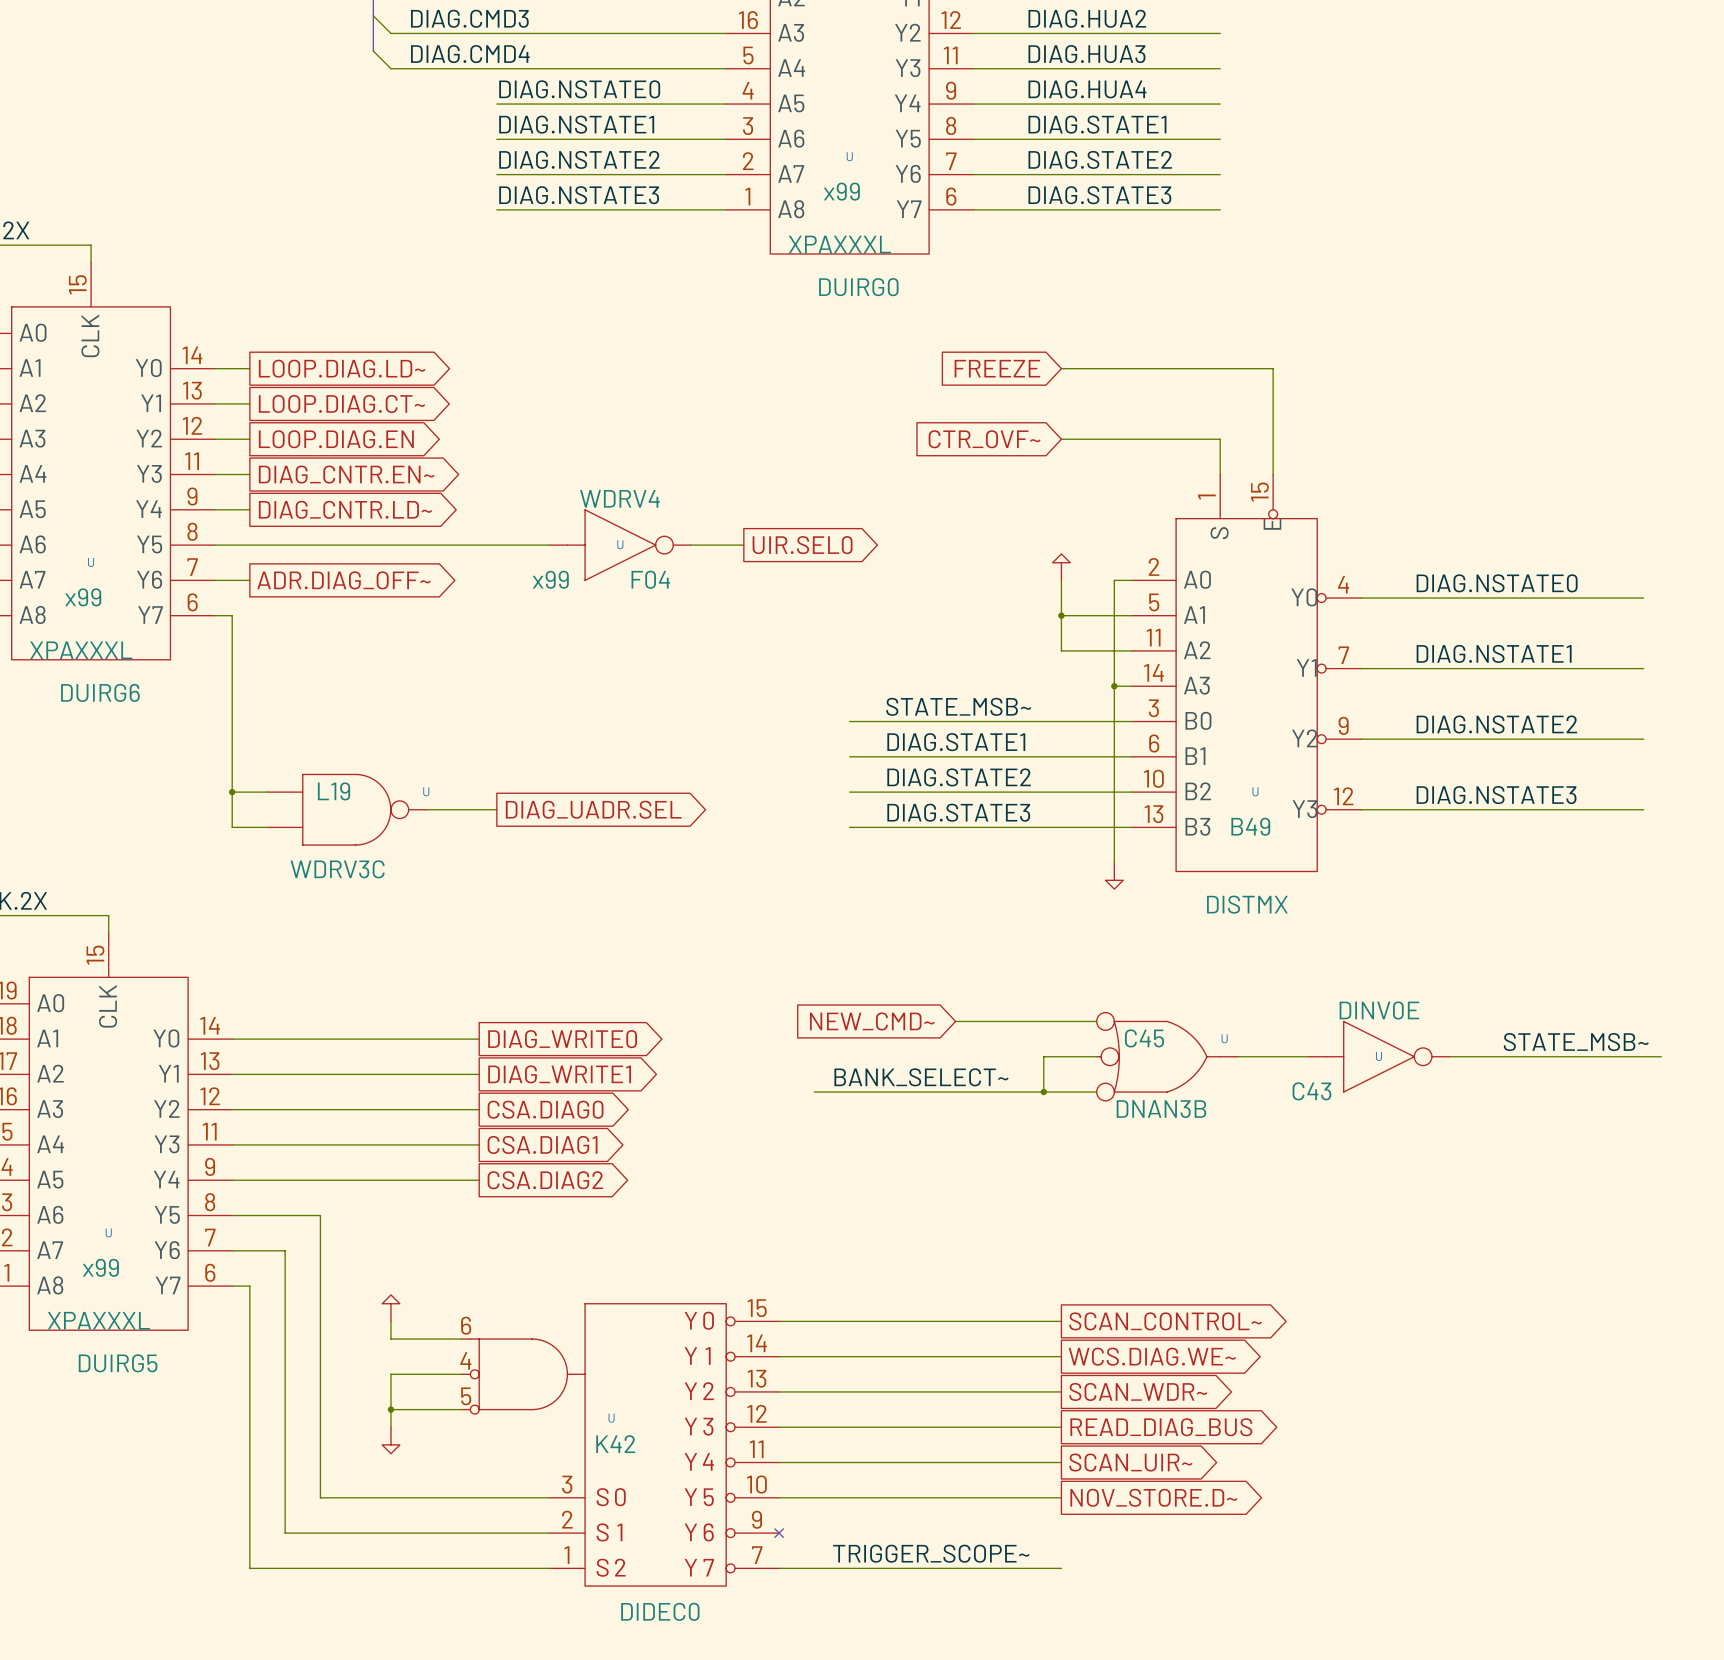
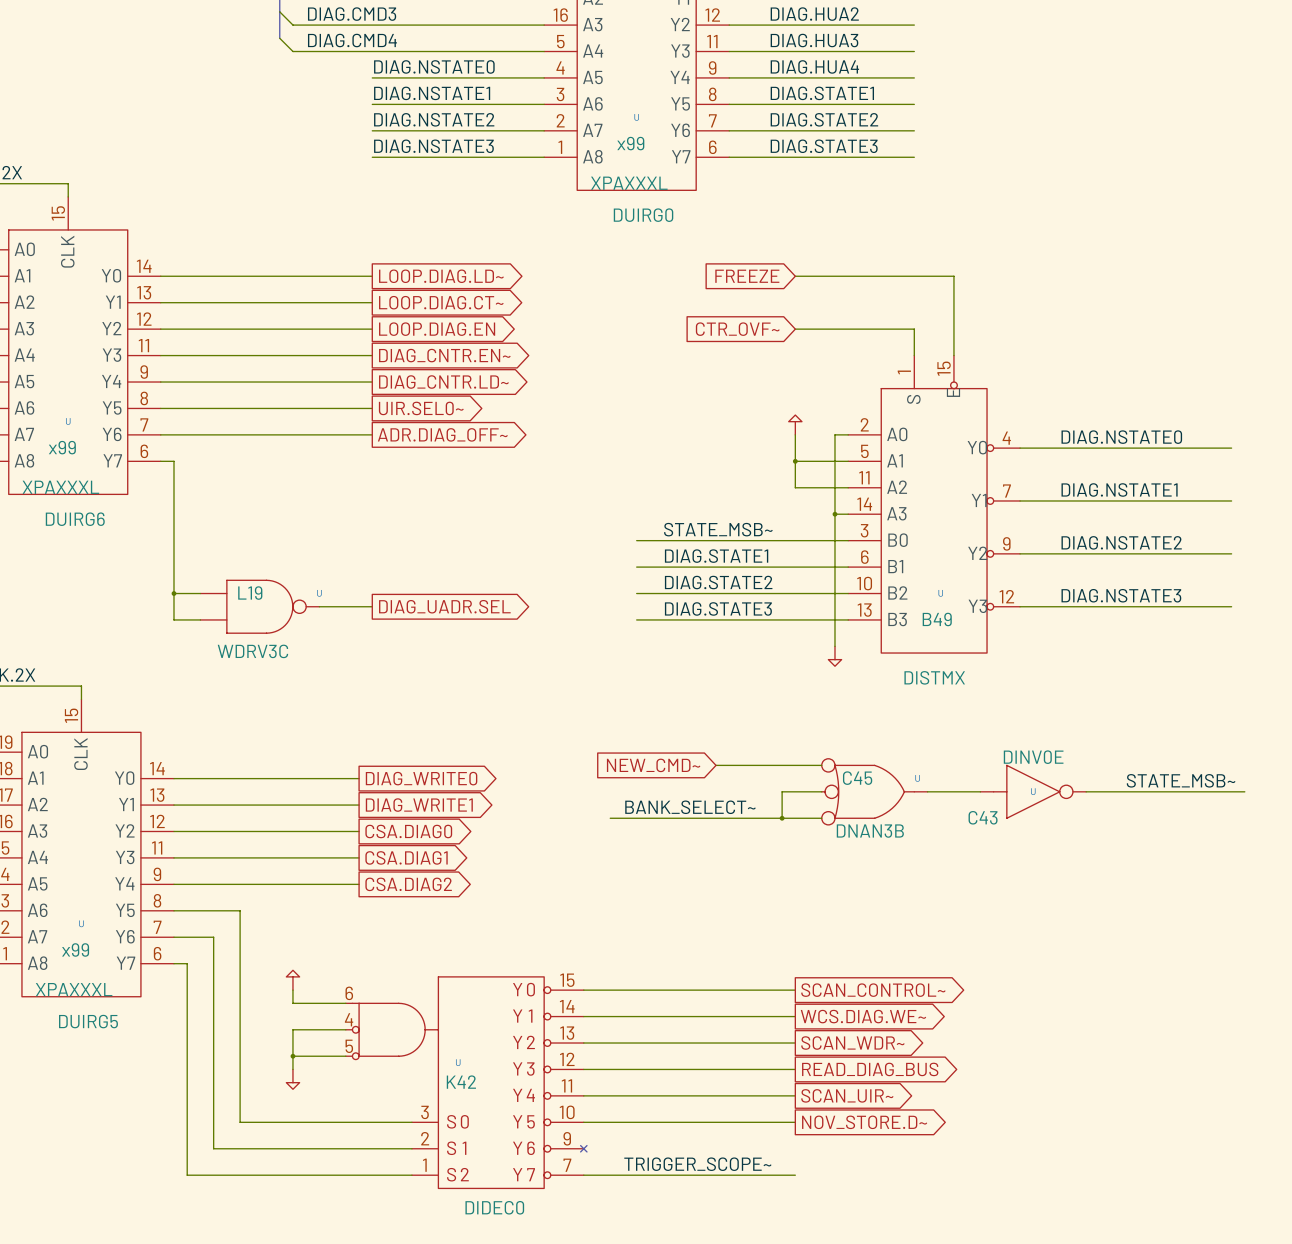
wire: none -> (187, 276) (372, 276)
global label: LOOP.DIAG.LD~ (342, 368) -> none
global label: none -> LOOP.DIAG.LD~ (441, 276)
wire: none -> (187, 302) (372, 302)
global label: LOOP.DIAG.CT~ (342, 403) -> none
global label: none -> LOOP.DIAG.CT~ (441, 302)
wire: none -> (187, 329) (372, 329)
global label: LOOP.DIAG.EN (336, 439) -> none
global label: none -> LOOP.DIAG.EN (437, 329)
wire: none -> (187, 355) (372, 355)
global label: DIAG_CNTR.EN~ (346, 474) -> none
global label: none -> DIAG_CNTR.EN~ (444, 355)
wire: none -> (187, 382) (372, 382)
global label: DIAG_CNTR.LD~ (345, 509) -> none
global label: none -> DIAG_CNTR.LD~ (443, 382)
wire: (496, 545) (549, 545) -> none
global label: none -> UIR.SEL0~ (421, 408)
U: F04 (620, 545) -> none
wire: (690, 545) (743, 545) -> none
global label: UIR.SEL0 (802, 545) -> none
wire: none -> (187, 434) (372, 434)
global label: ADR.DIAG_OFF~ (344, 580) -> none
global label: none -> ADR.DIAG_OFF~ (442, 434)

